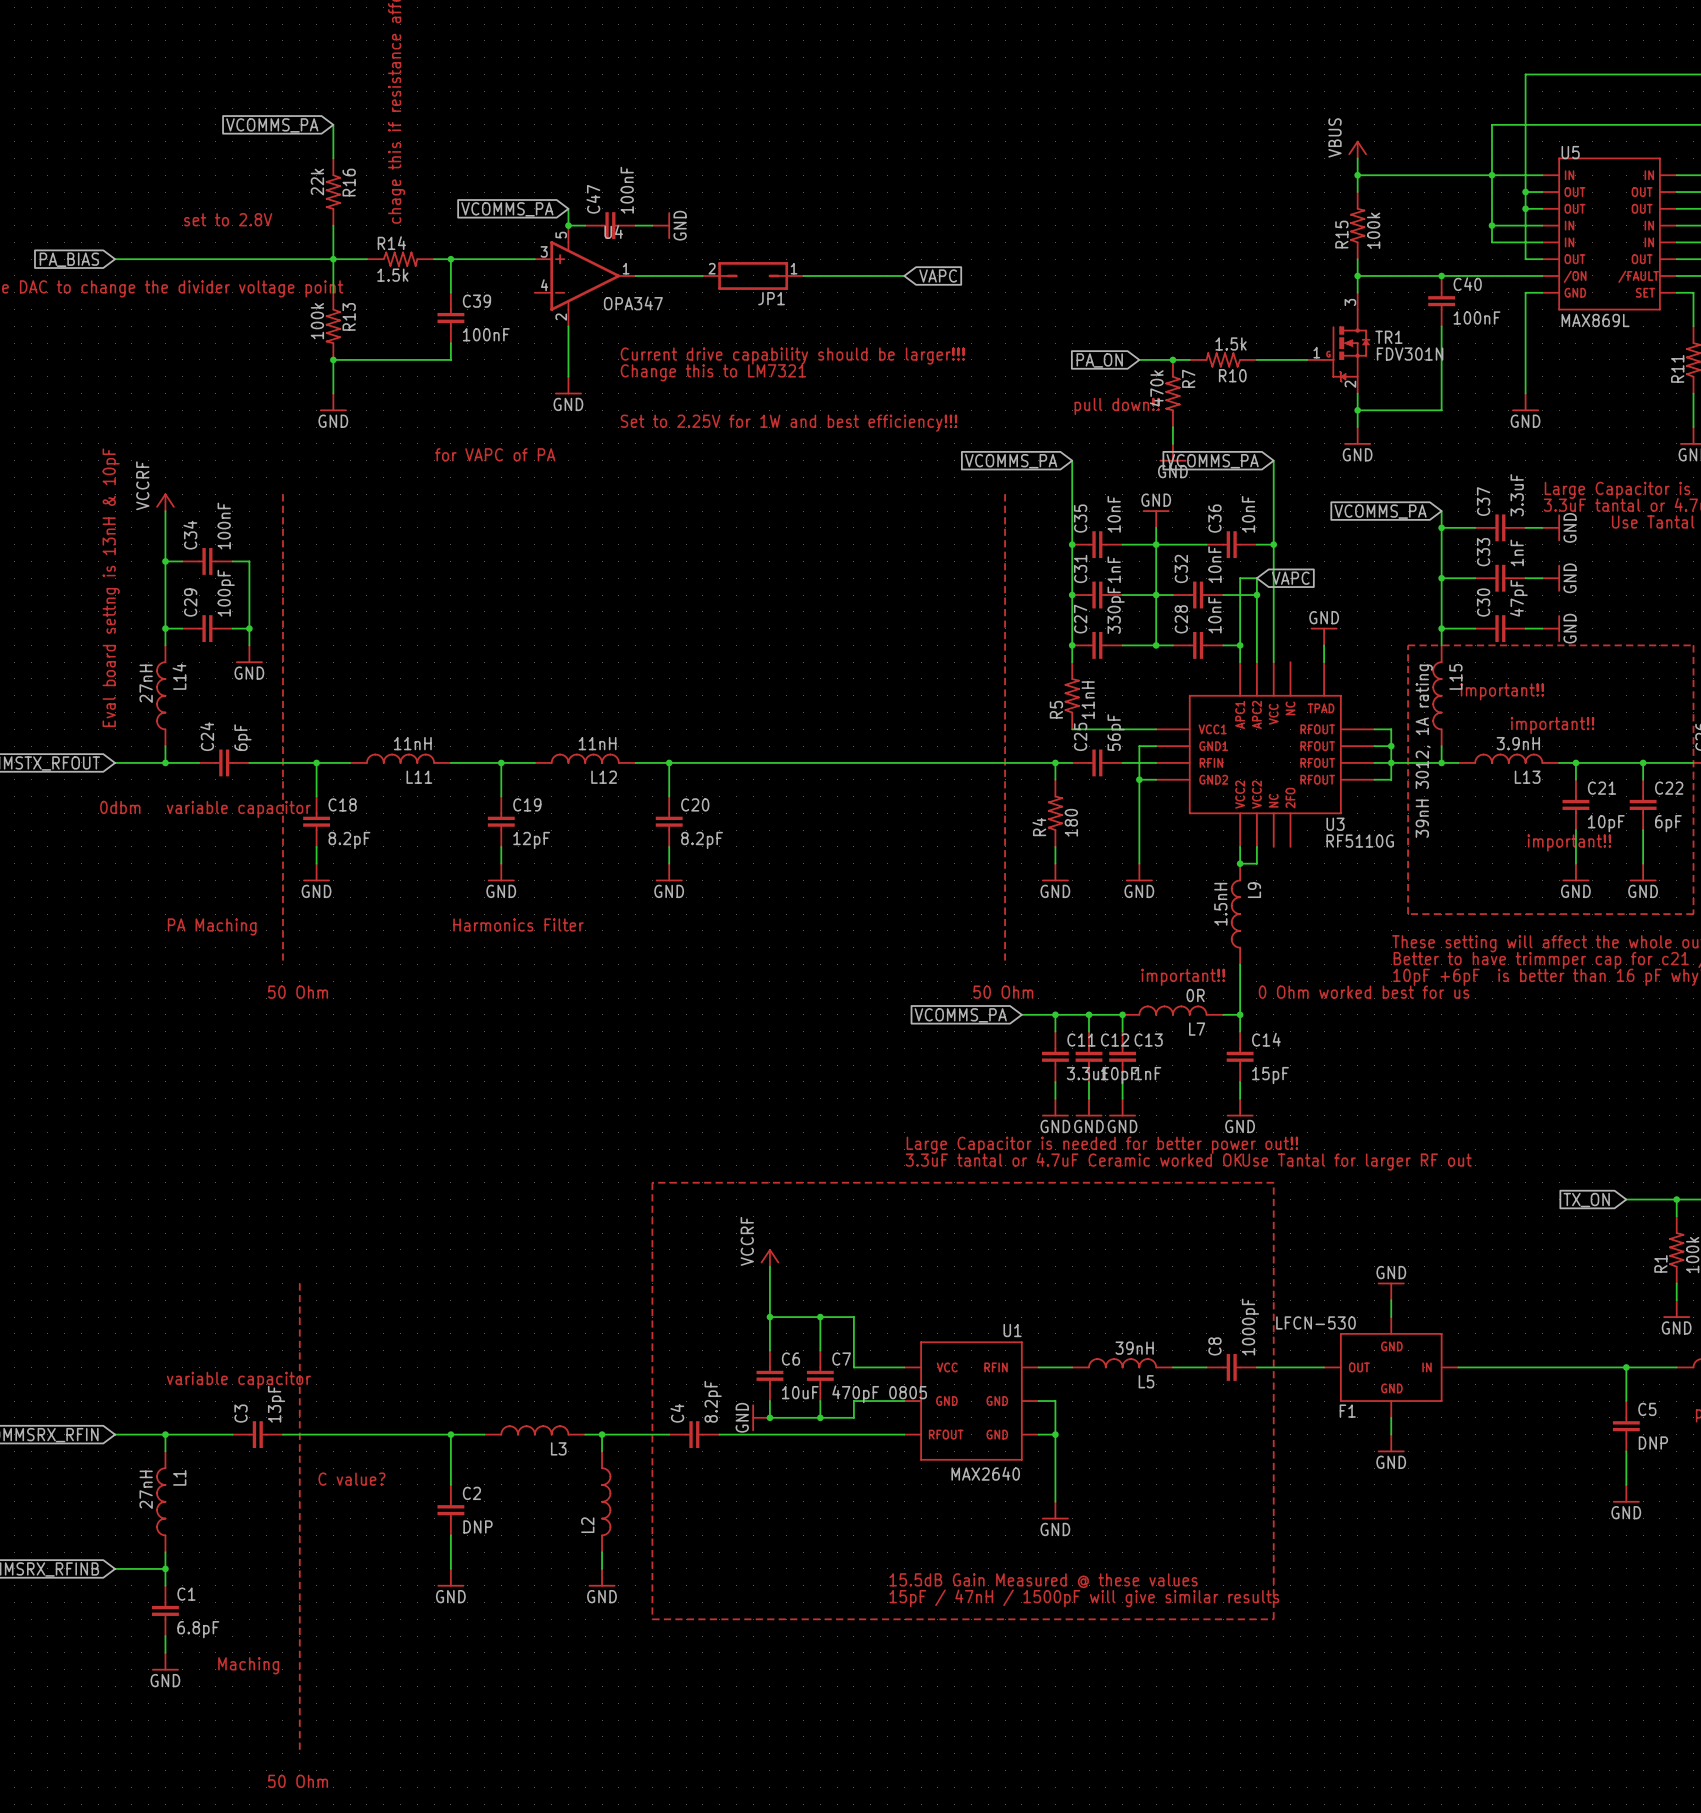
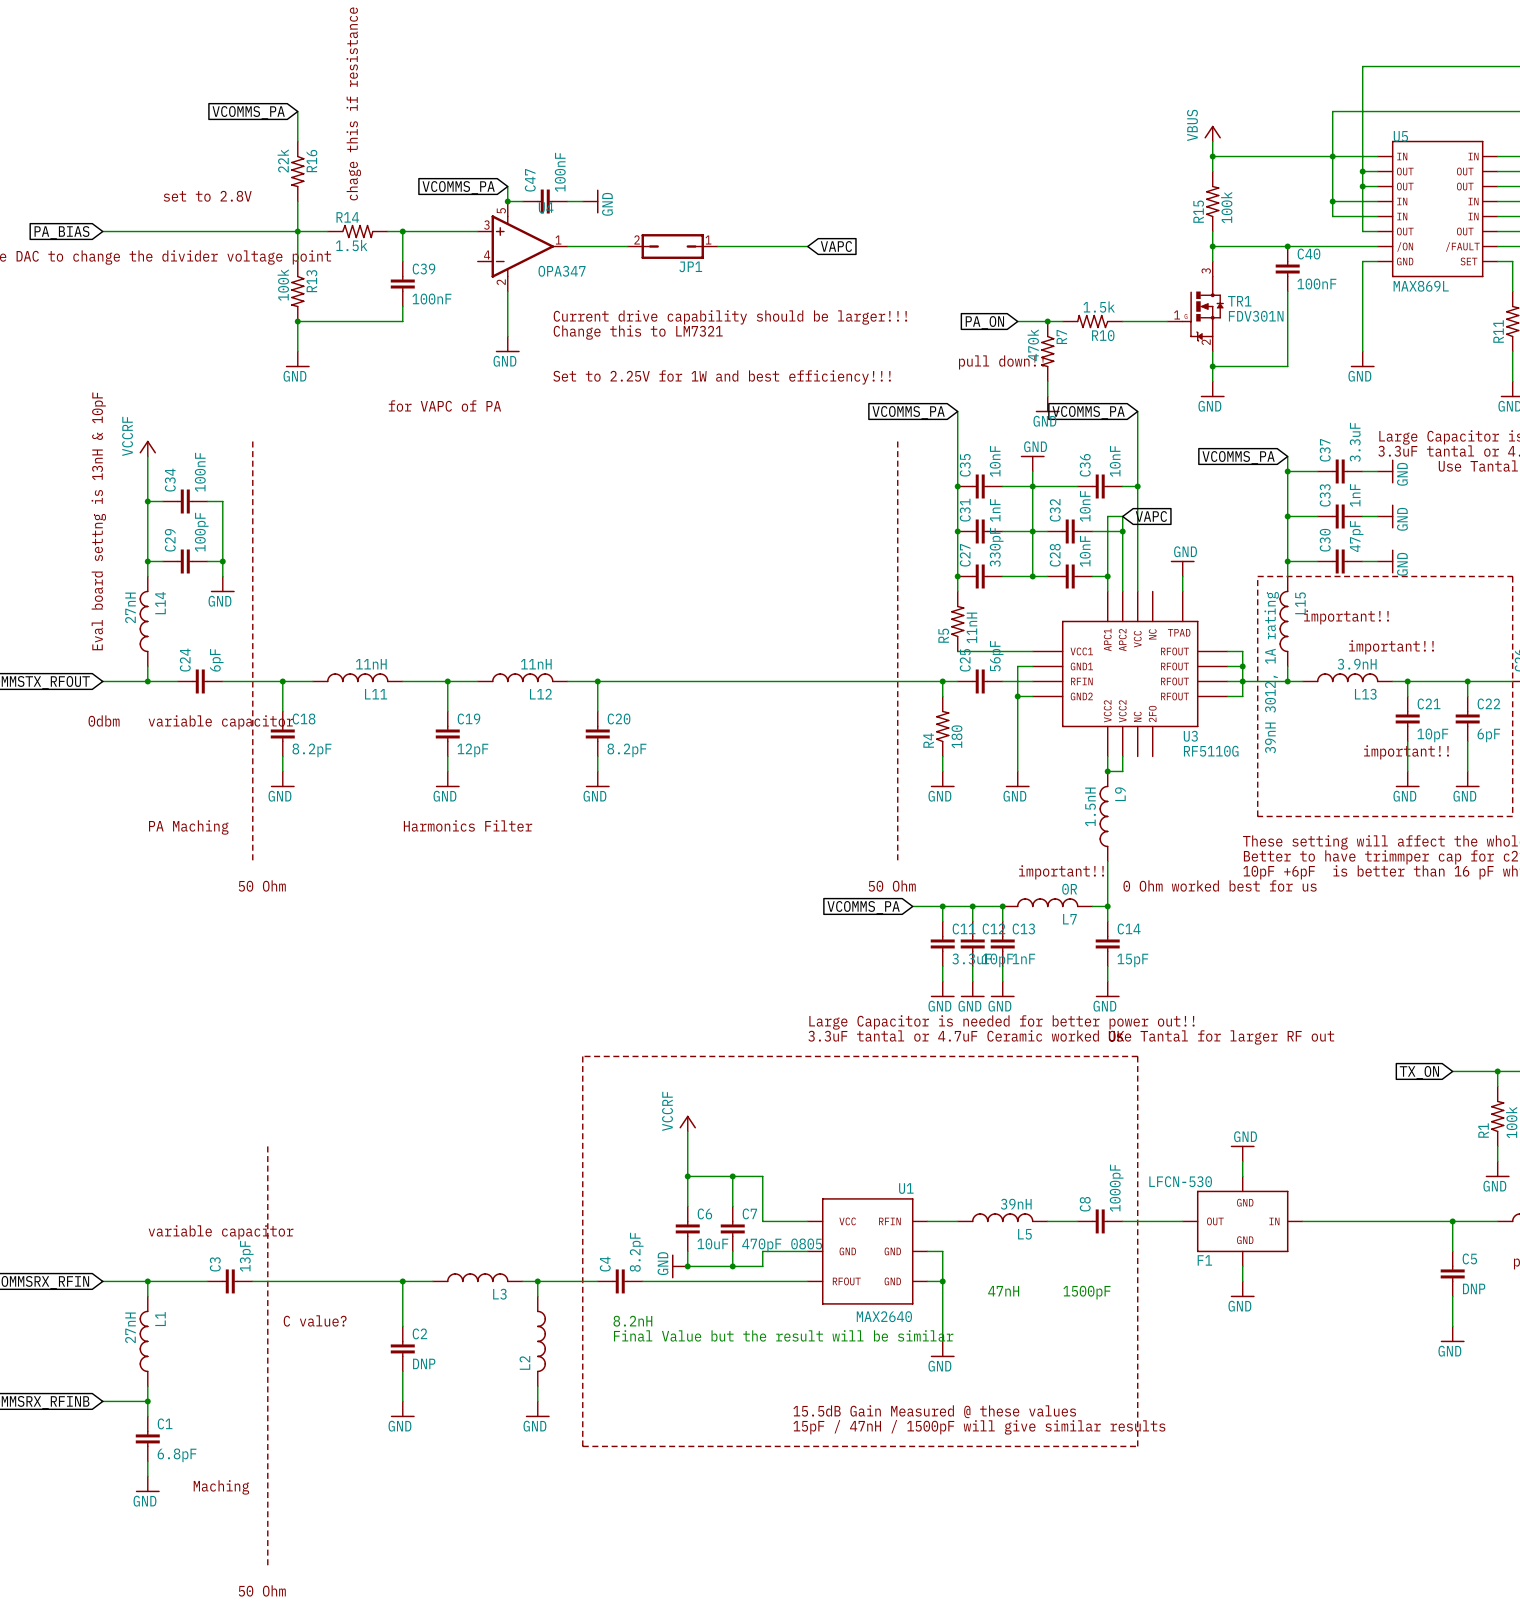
text: none -> 47nH (1003, 1291)
text: none -> 1500pF (1086, 1292)
text: none -> 8.2nH (632, 1321)
text: none -> Final Value but the result will be similar (783, 1335)

